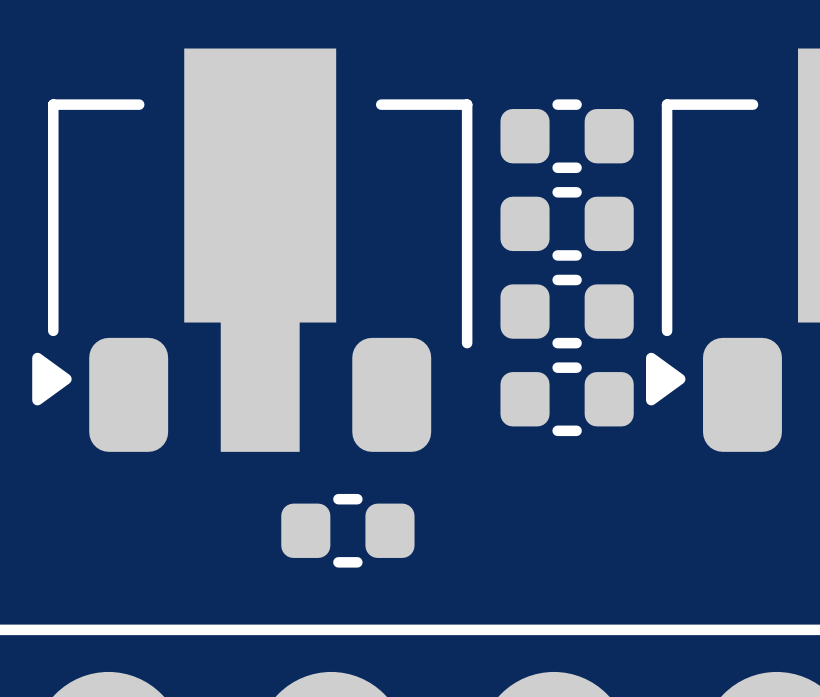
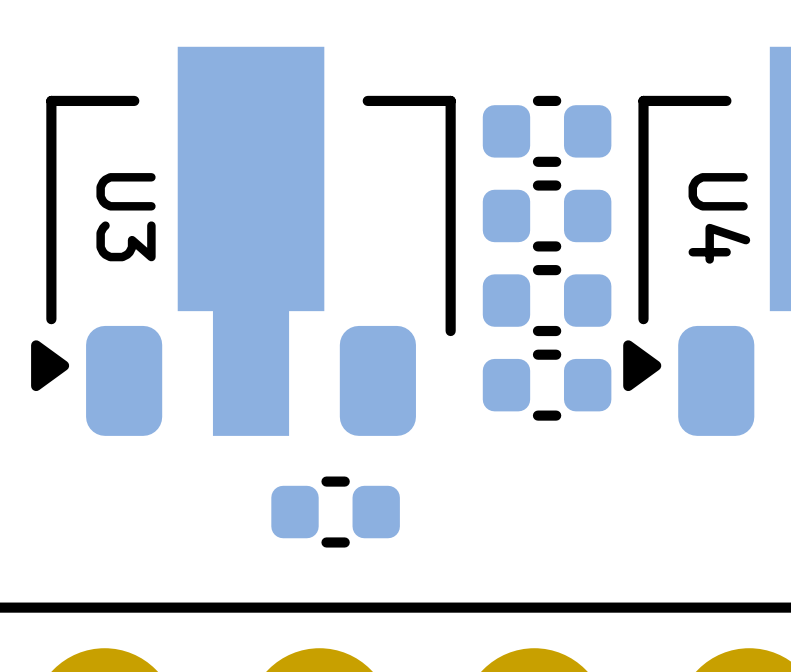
U3 name: none -> U3 (126, 217)
U4 name: none -> U4 (719, 218)

